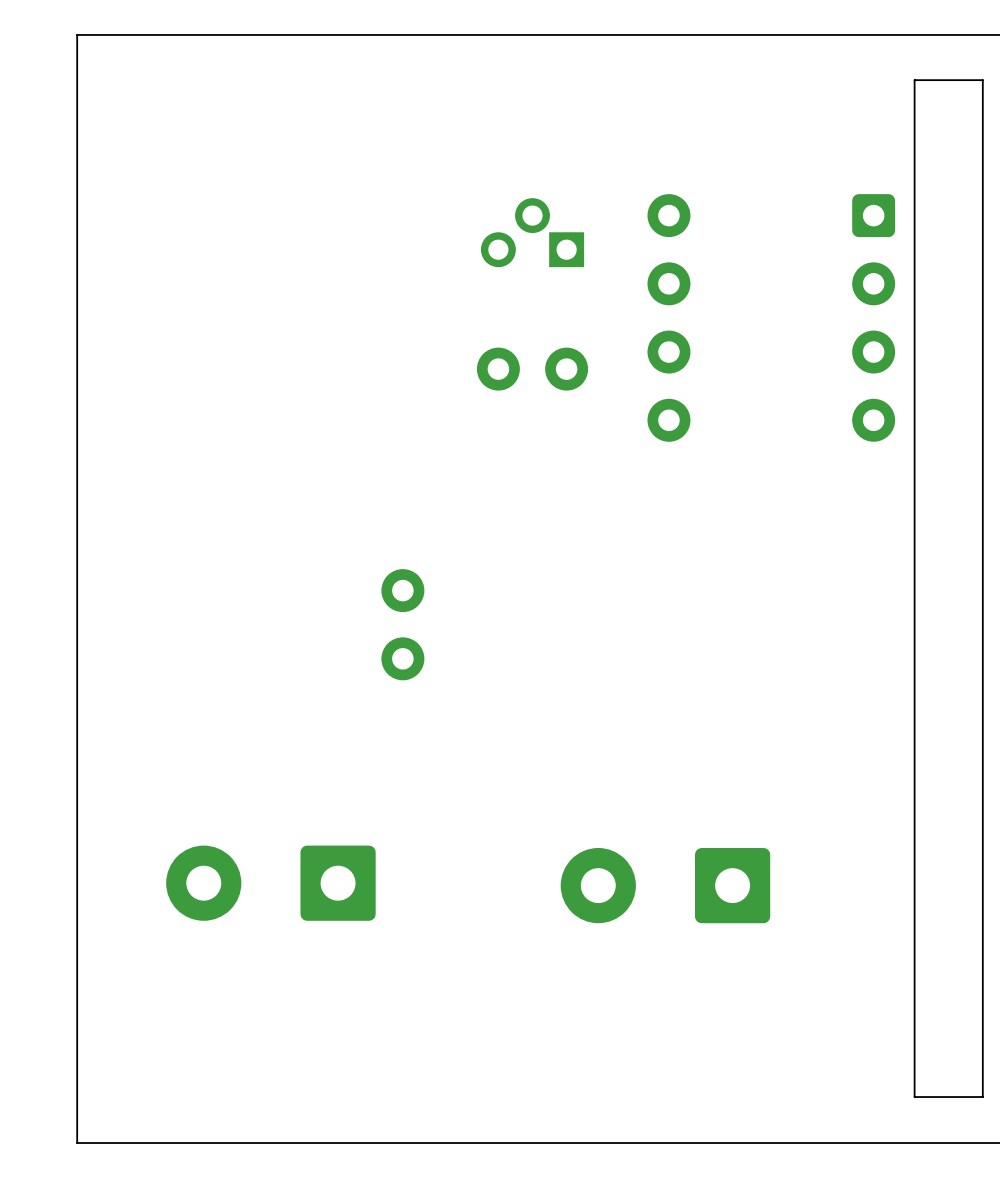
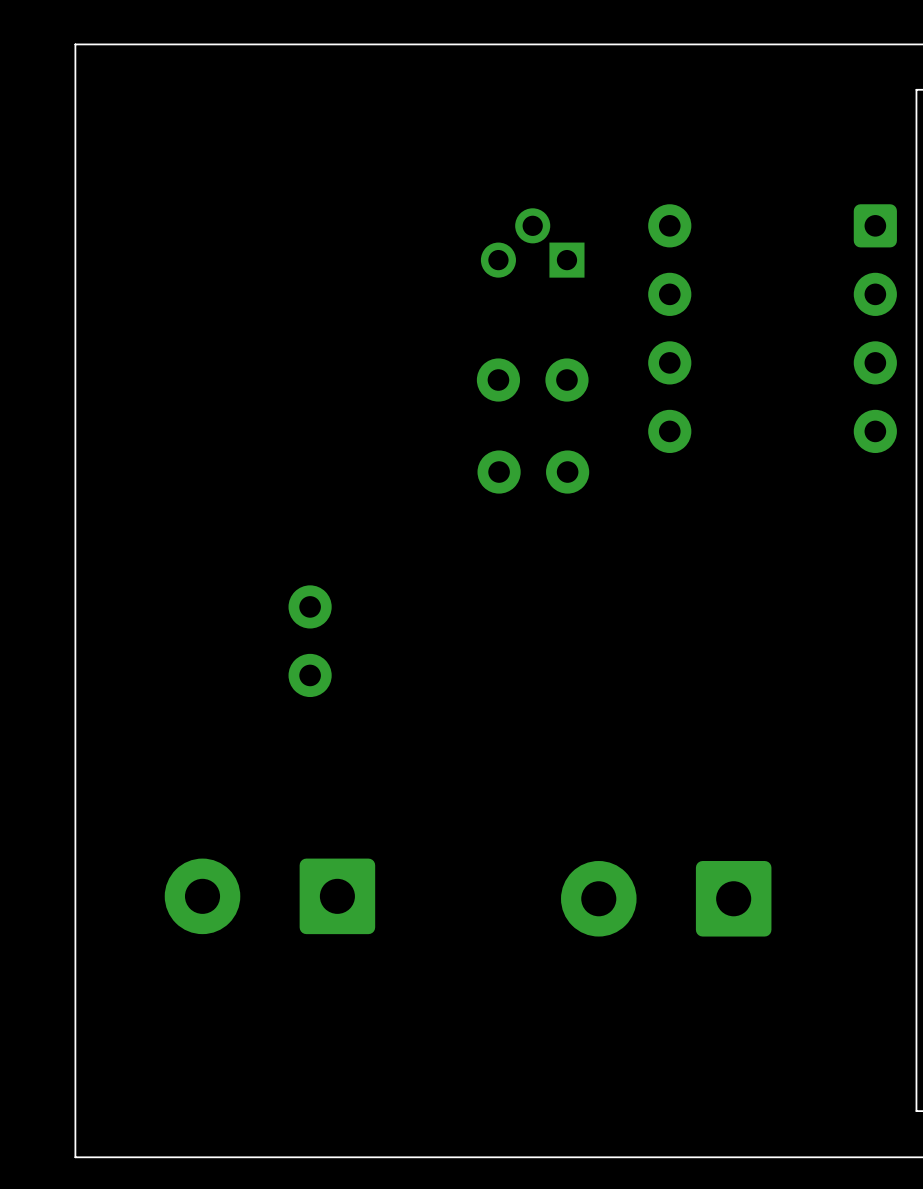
part: none -> (533, 472)
part position: (402, 624) -> (310, 641)

